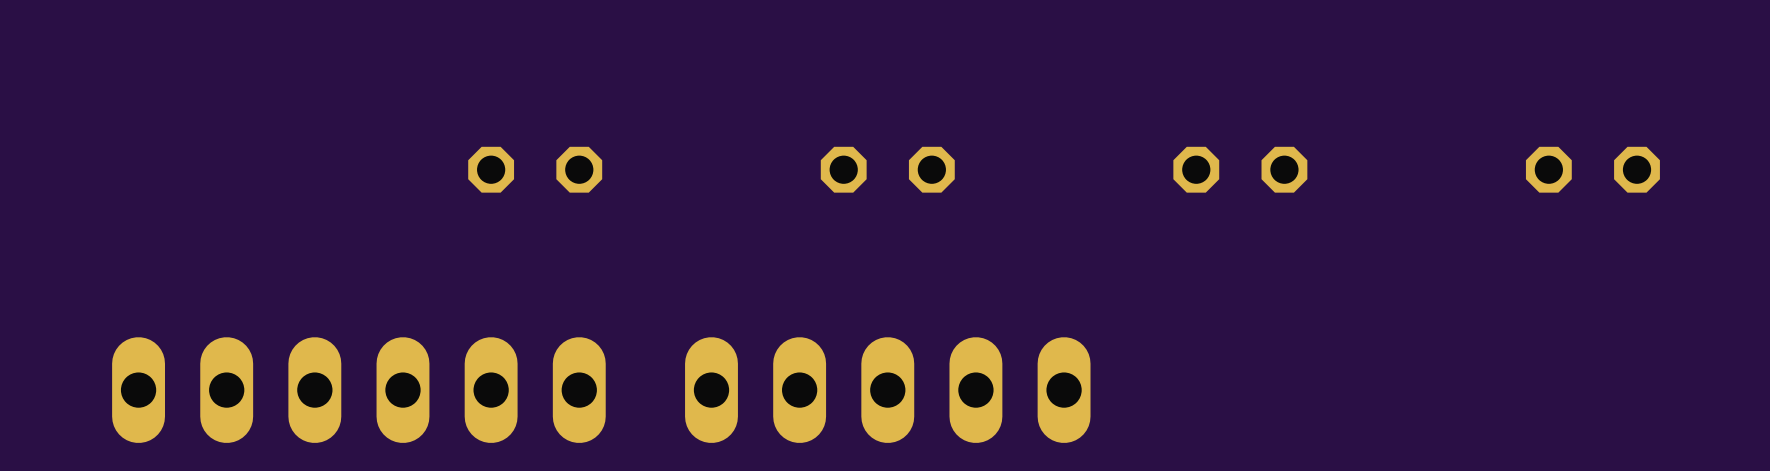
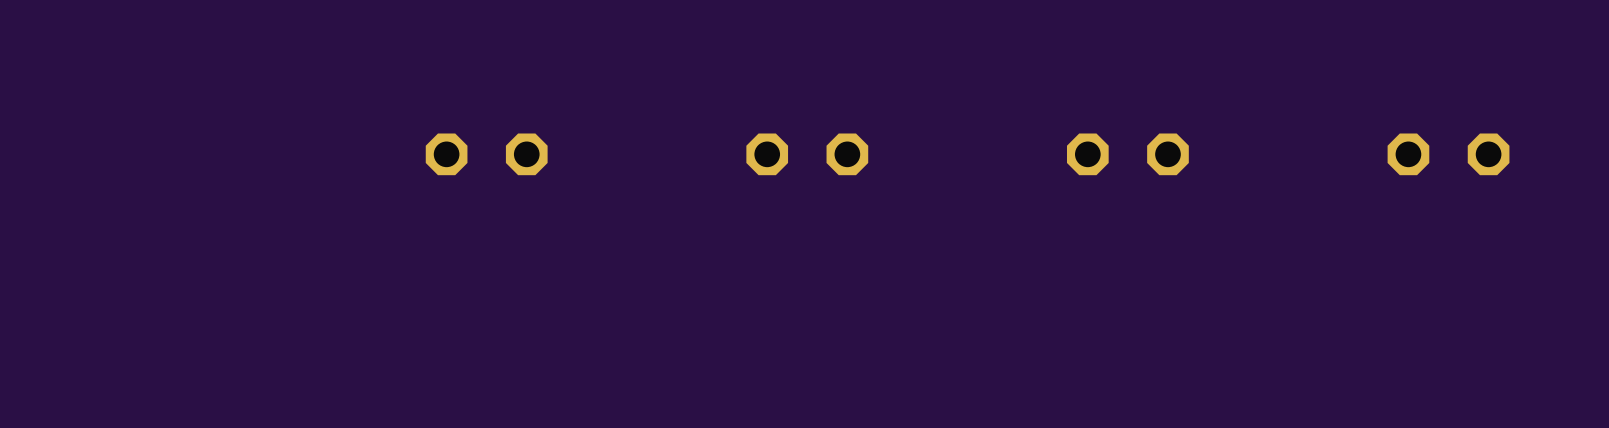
part: (358, 390) -> none
part: (887, 390) -> none

